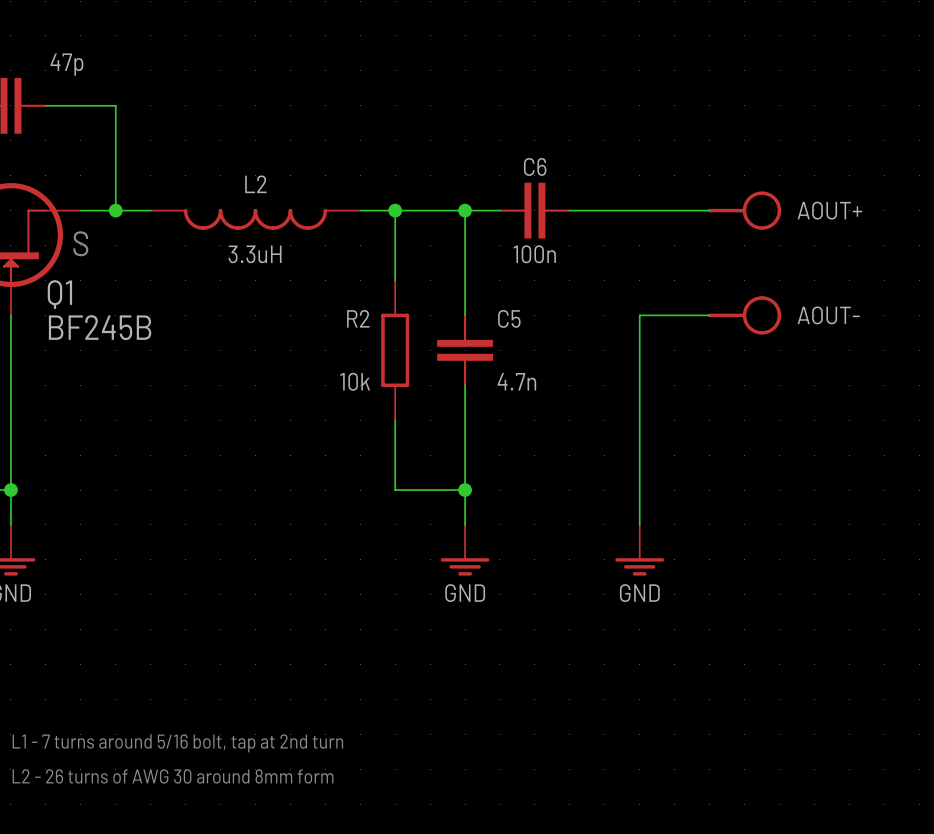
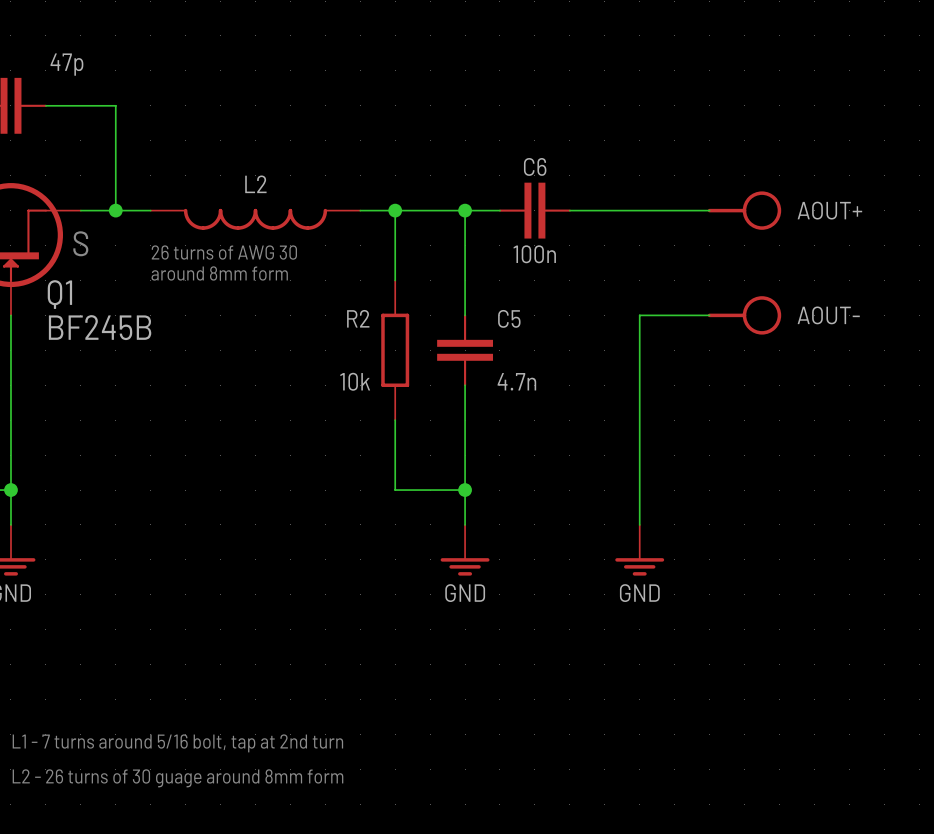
text: none -> 26 turns of AWG 30 (224, 252)
L2 value: 3.3uH (255, 254) -> none
text: none -> around 8mm form (219, 273)
text: L2 - 26 turns of AWG 30 around 8mm form (173, 776) -> L2 - 26 turns of 30 guage around 8mm form (177, 778)

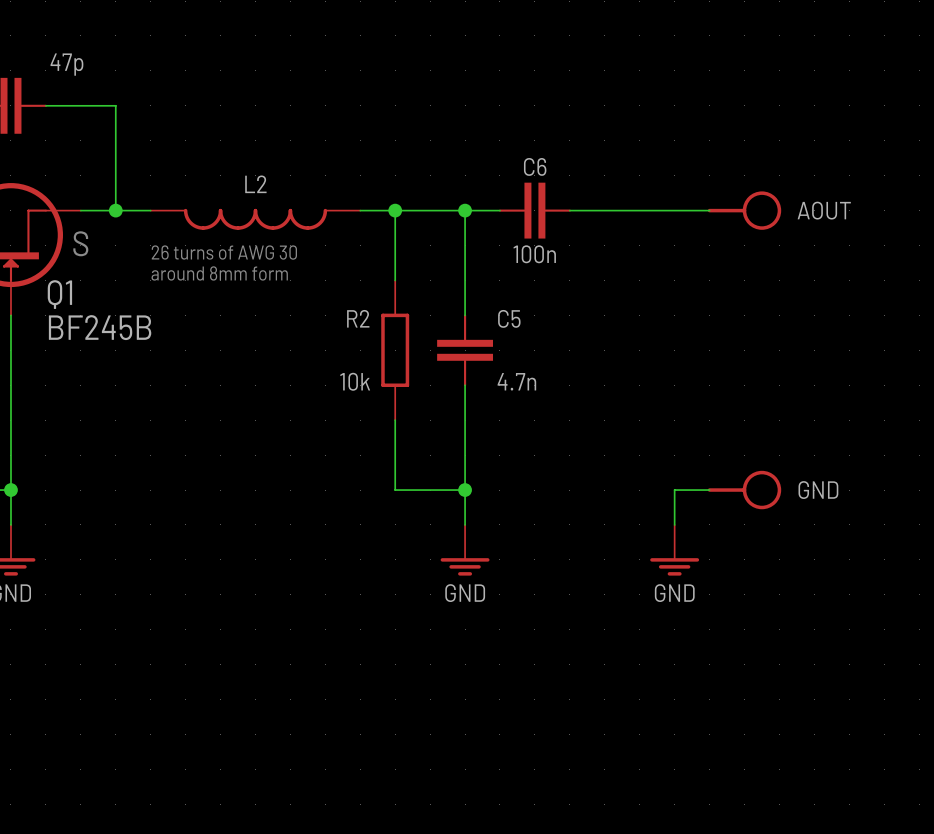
AOUT+ name: AOUT+ (829, 210) -> AOUT (824, 210)
wire: (709, 315) (639, 315) (639, 524) -> none
AOUT-: (744, 315) -> none
wire: none -> (709, 490) (674, 490) (674, 524)
GND: none -> (744, 490)
power symbol position: GND (639, 550) -> GND (674, 550)
text: L1 - 7 turns around 5/16 bolt, tap at 2nd turn (177, 743) -> none
text: L2 - 26 turns of 30 guage around 8mm form (177, 778) -> none

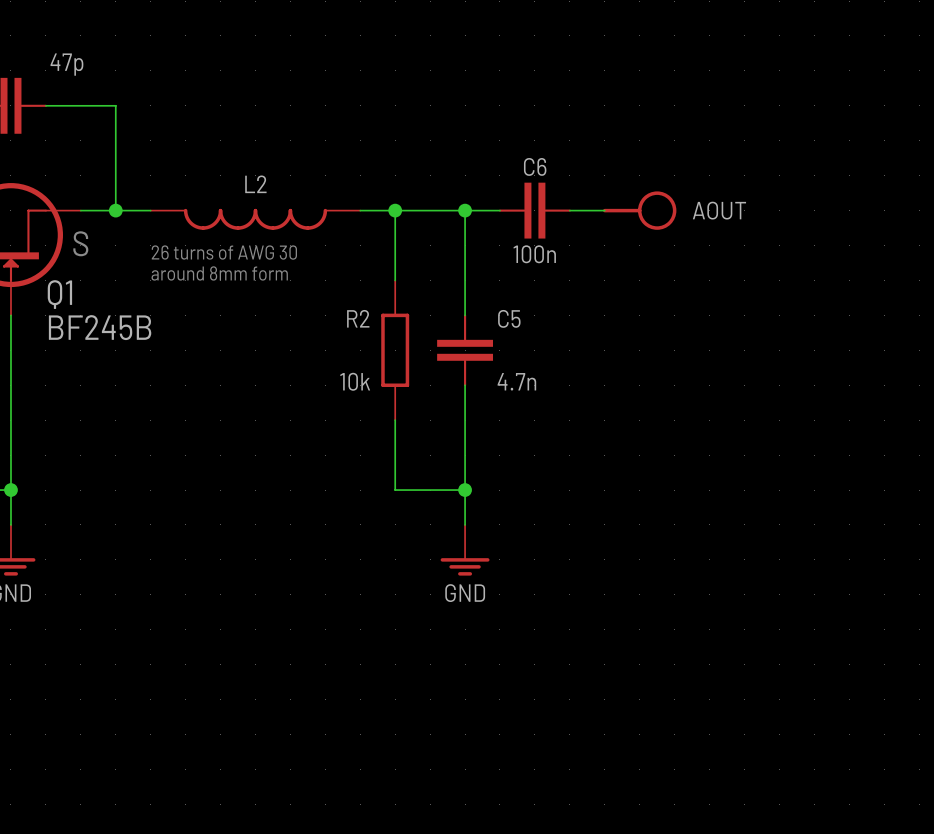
wire: (604, 210) (709, 210) -> none
AOUT position: (744, 210) -> (639, 210)
wire: (709, 490) (674, 490) (674, 524) -> none
GND: (744, 490) -> none
power symbol: GND (674, 550) -> none

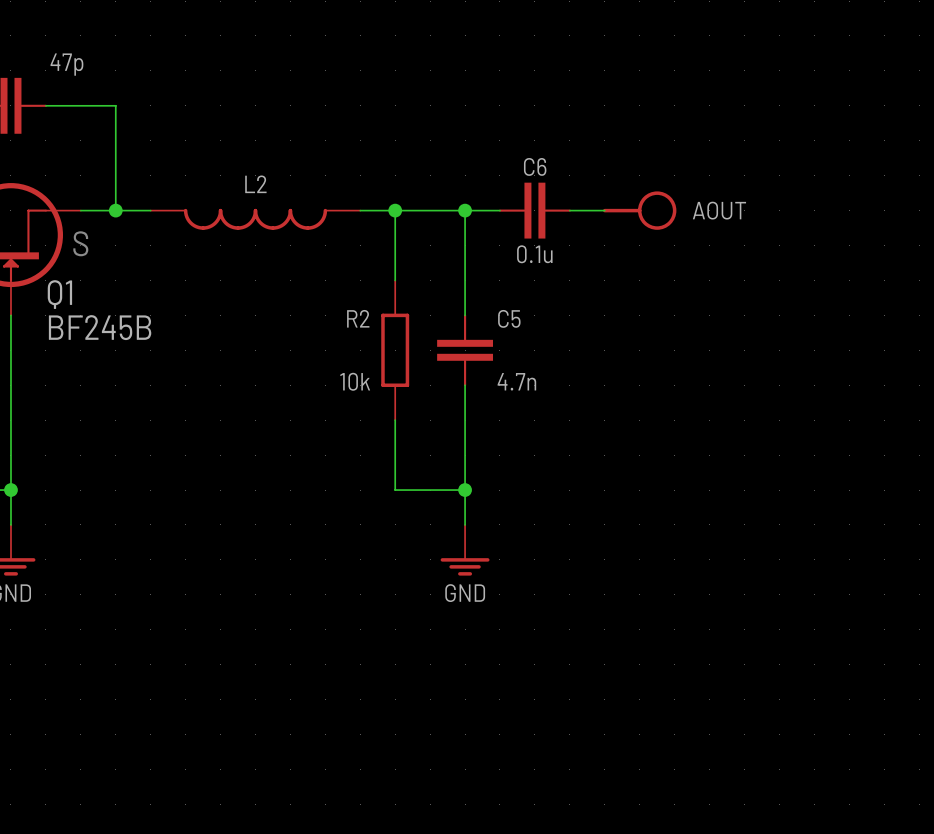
text: 26 turns of AWG 30 (224, 252) -> none
C6 value: 100n (534, 254) -> 0.1u (534, 254)
text: around 8mm form (219, 273) -> none

